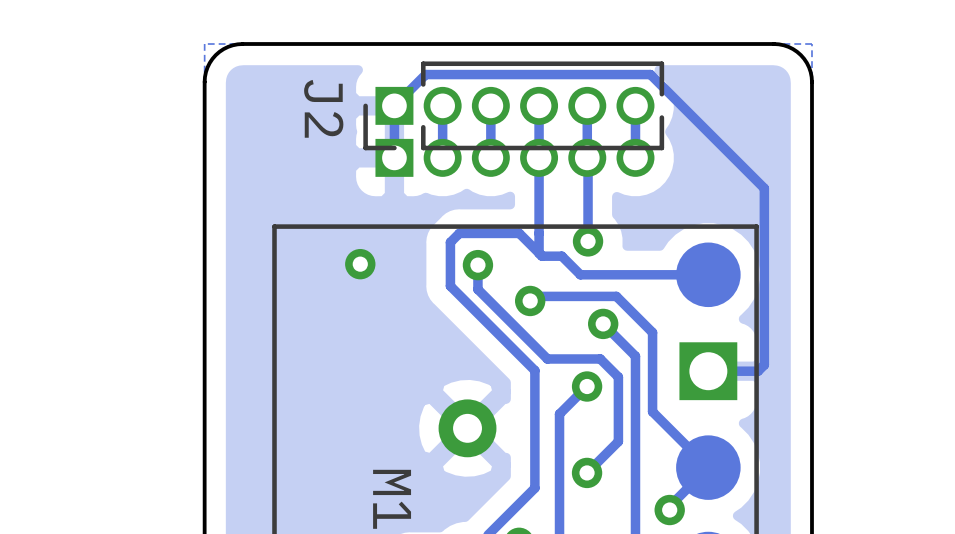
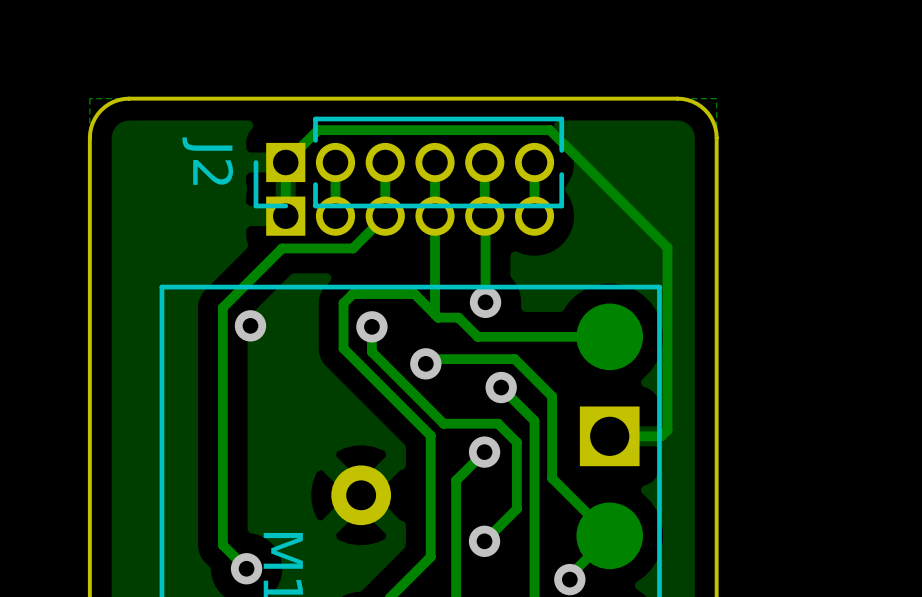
track: none -> (385, 216) (352, 248) (282, 248) (222, 307) (222, 545) (246, 568)
via: none -> (246, 568)

